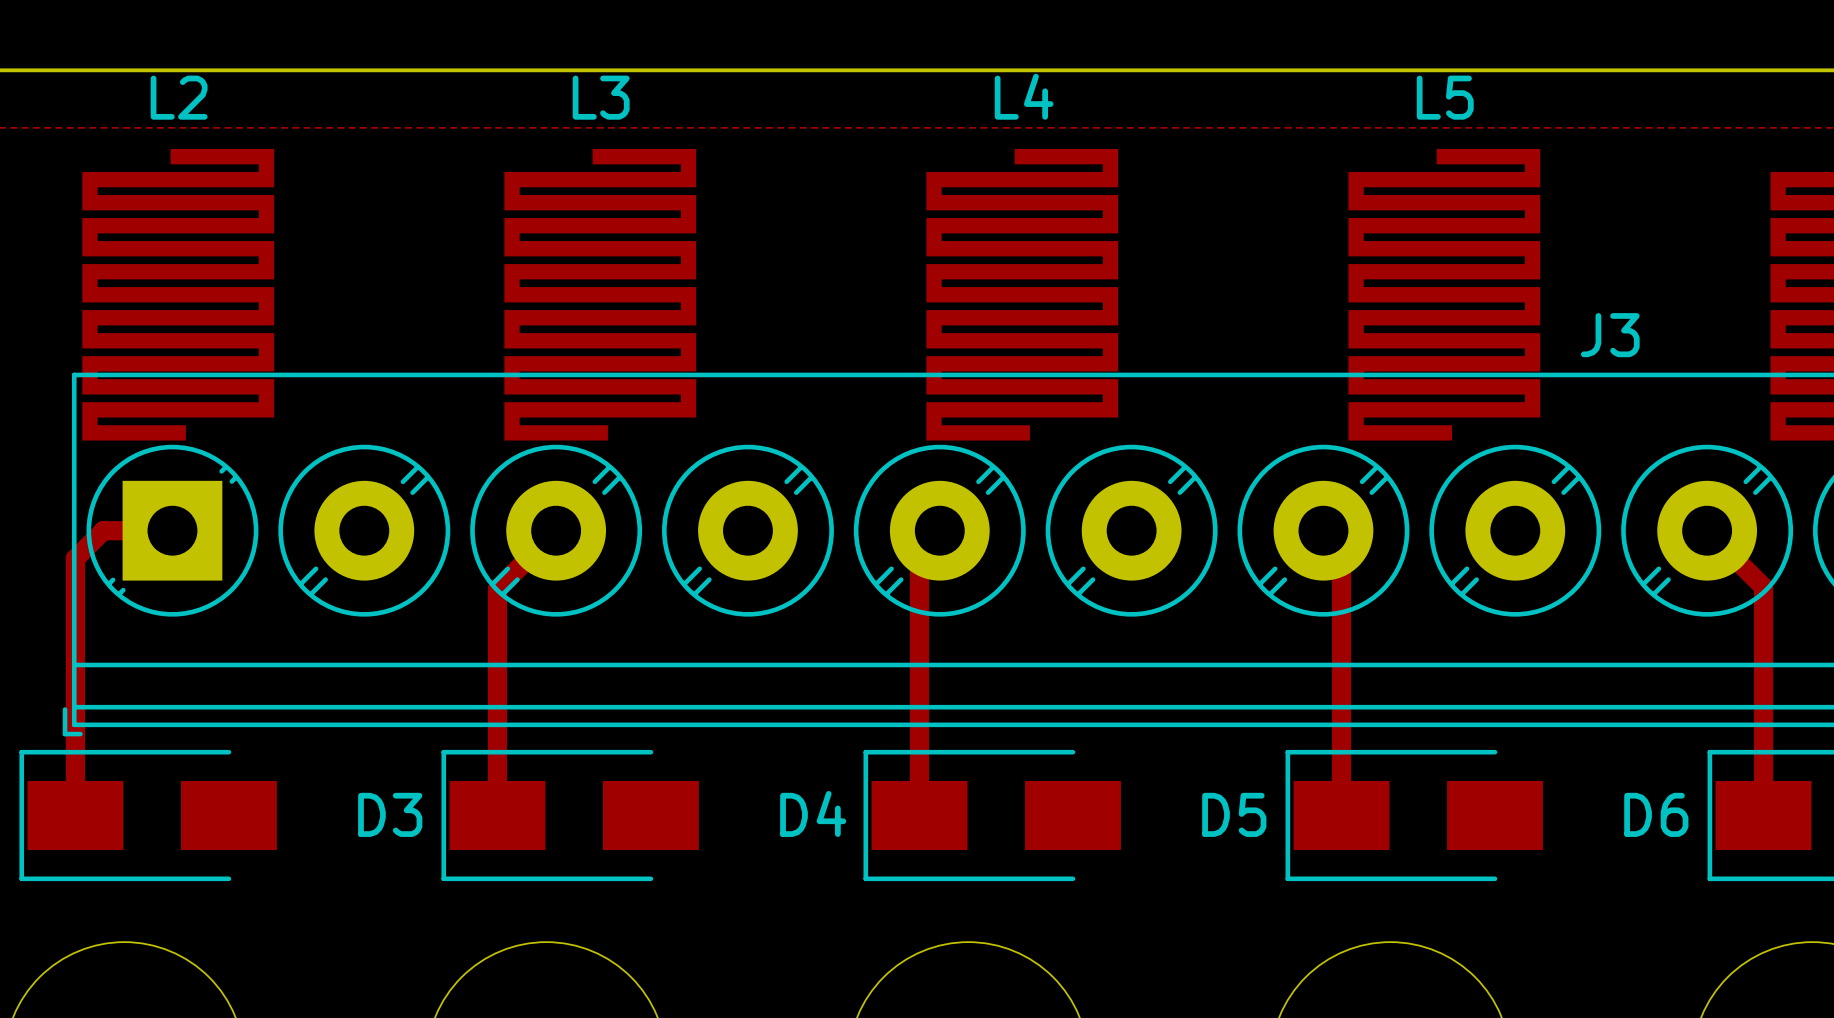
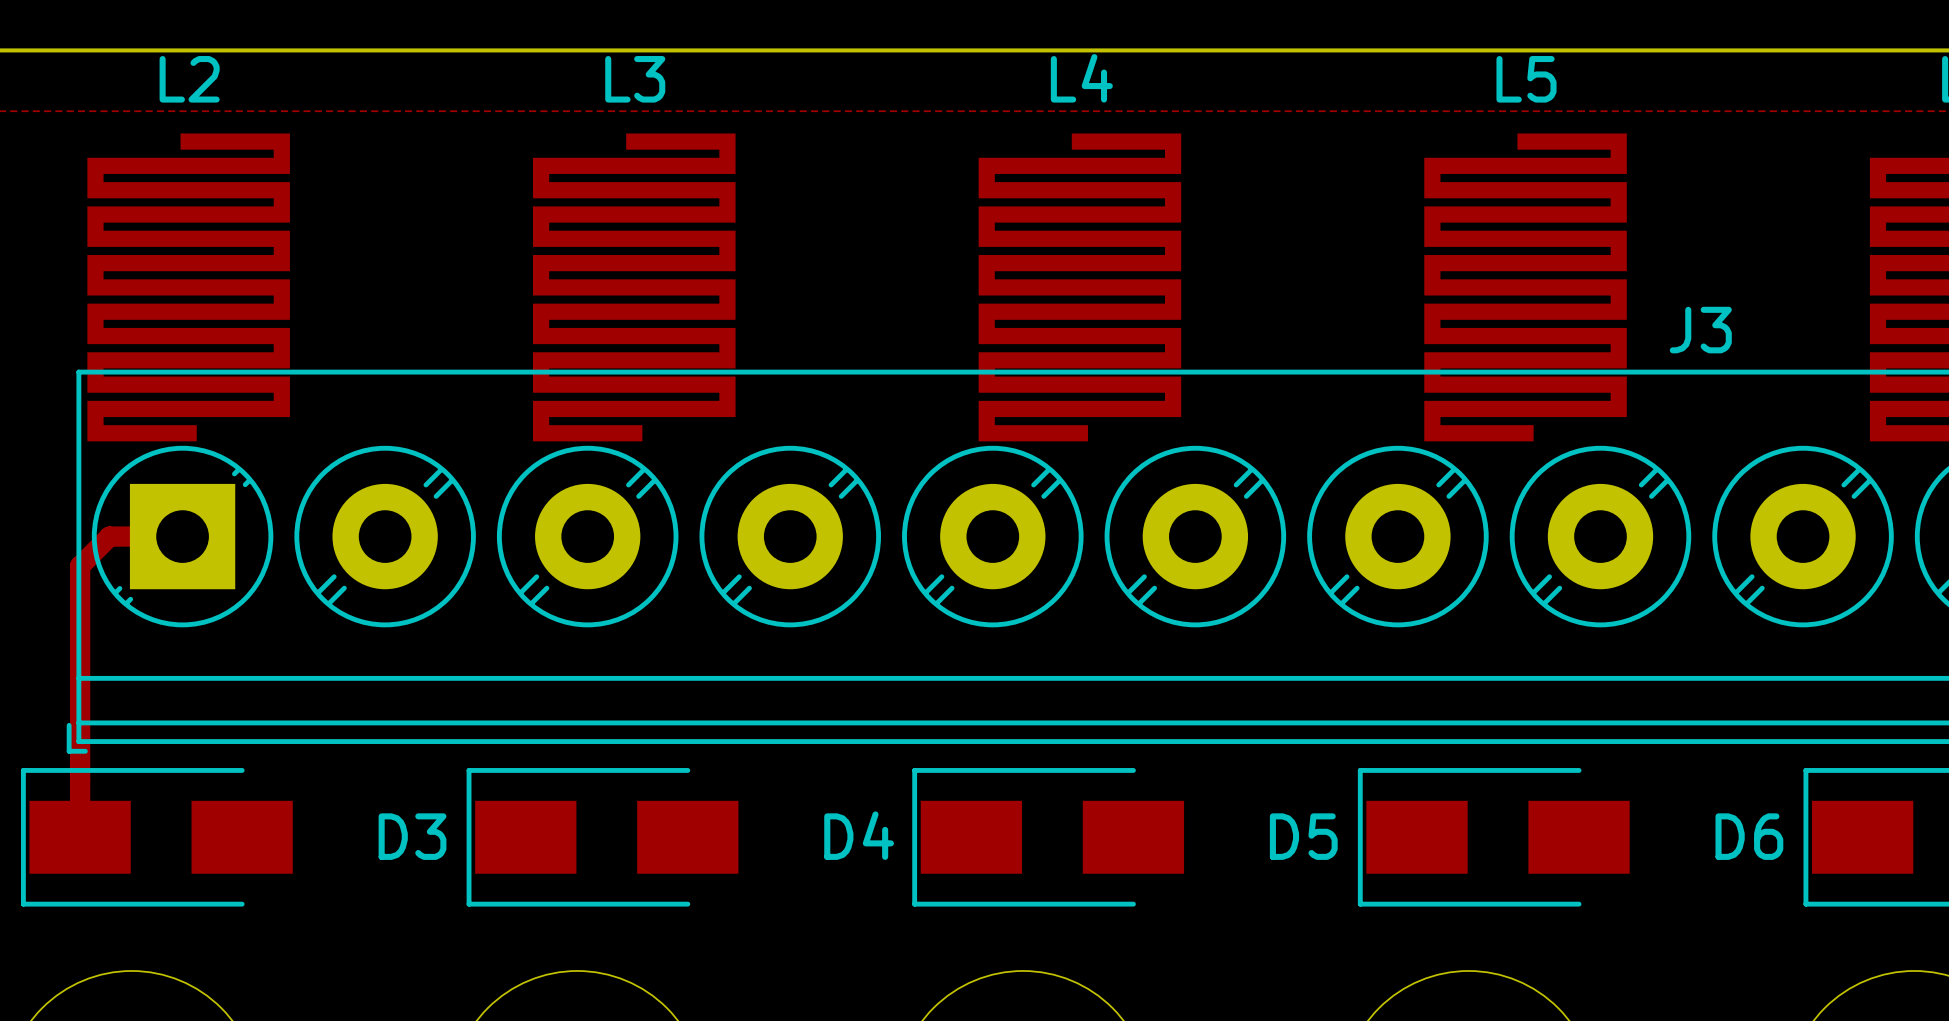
track: (556, 530) (497, 589) (497, 815) -> none
track: (939, 530) (919, 551) (919, 815) -> none
track: (1323, 530) (1341, 548) (1341, 815) -> none
track: (1707, 530) (1763, 587) (1763, 815) -> none

